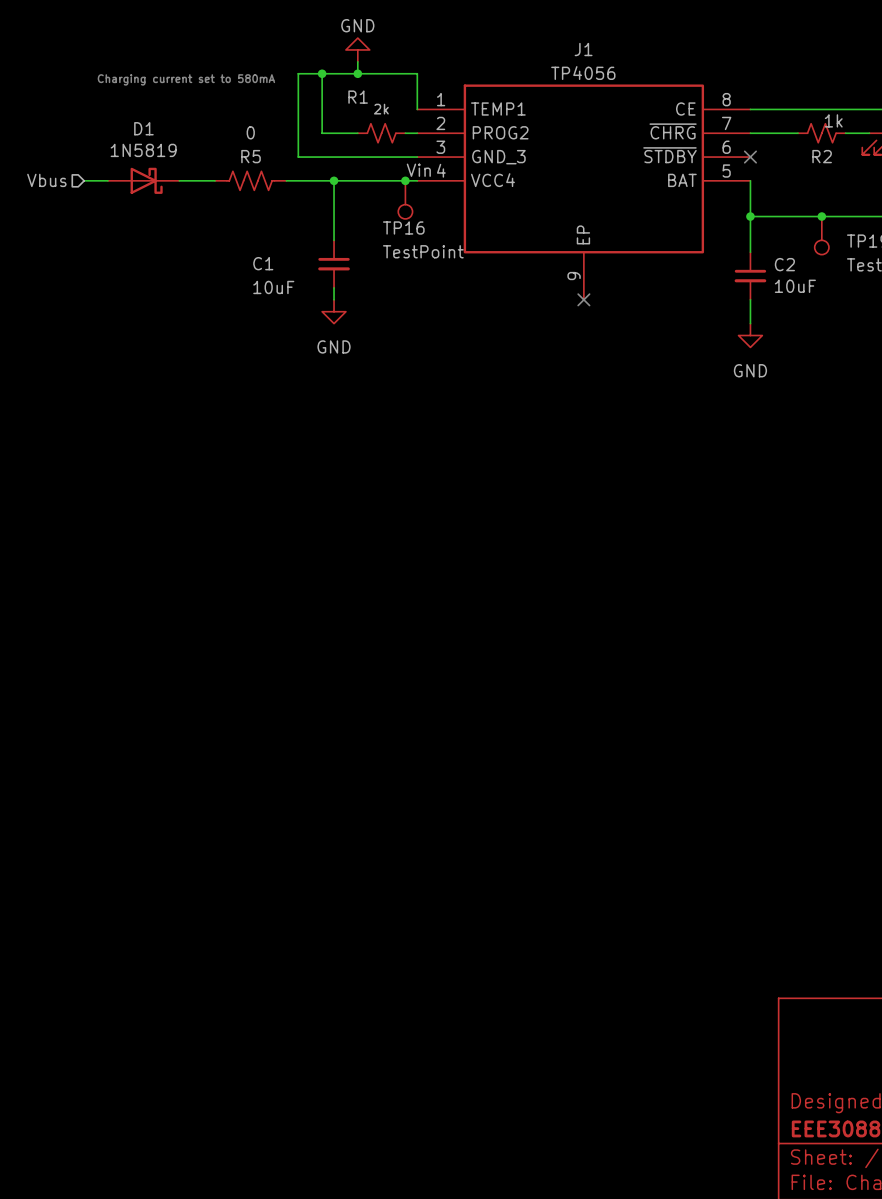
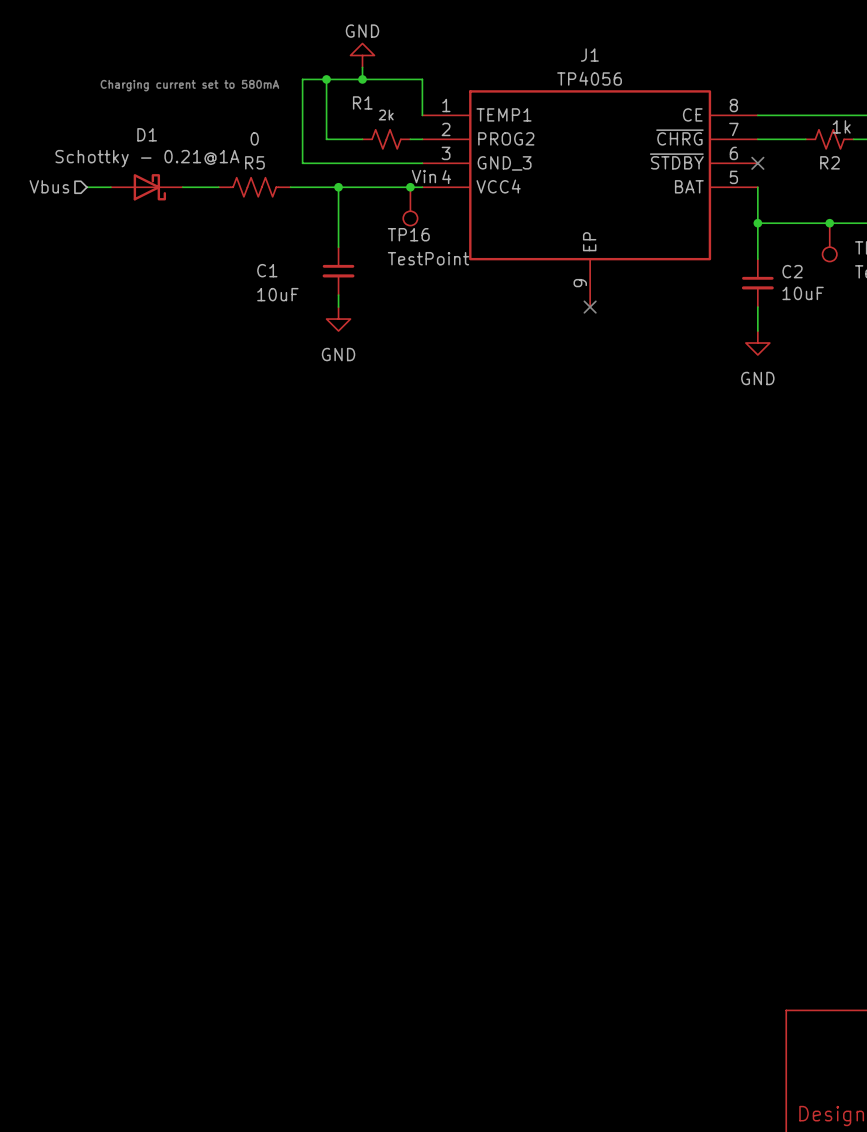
D1 value: 1N5819 (143, 150) -> Schottky - 0.21@1A (147, 158)

